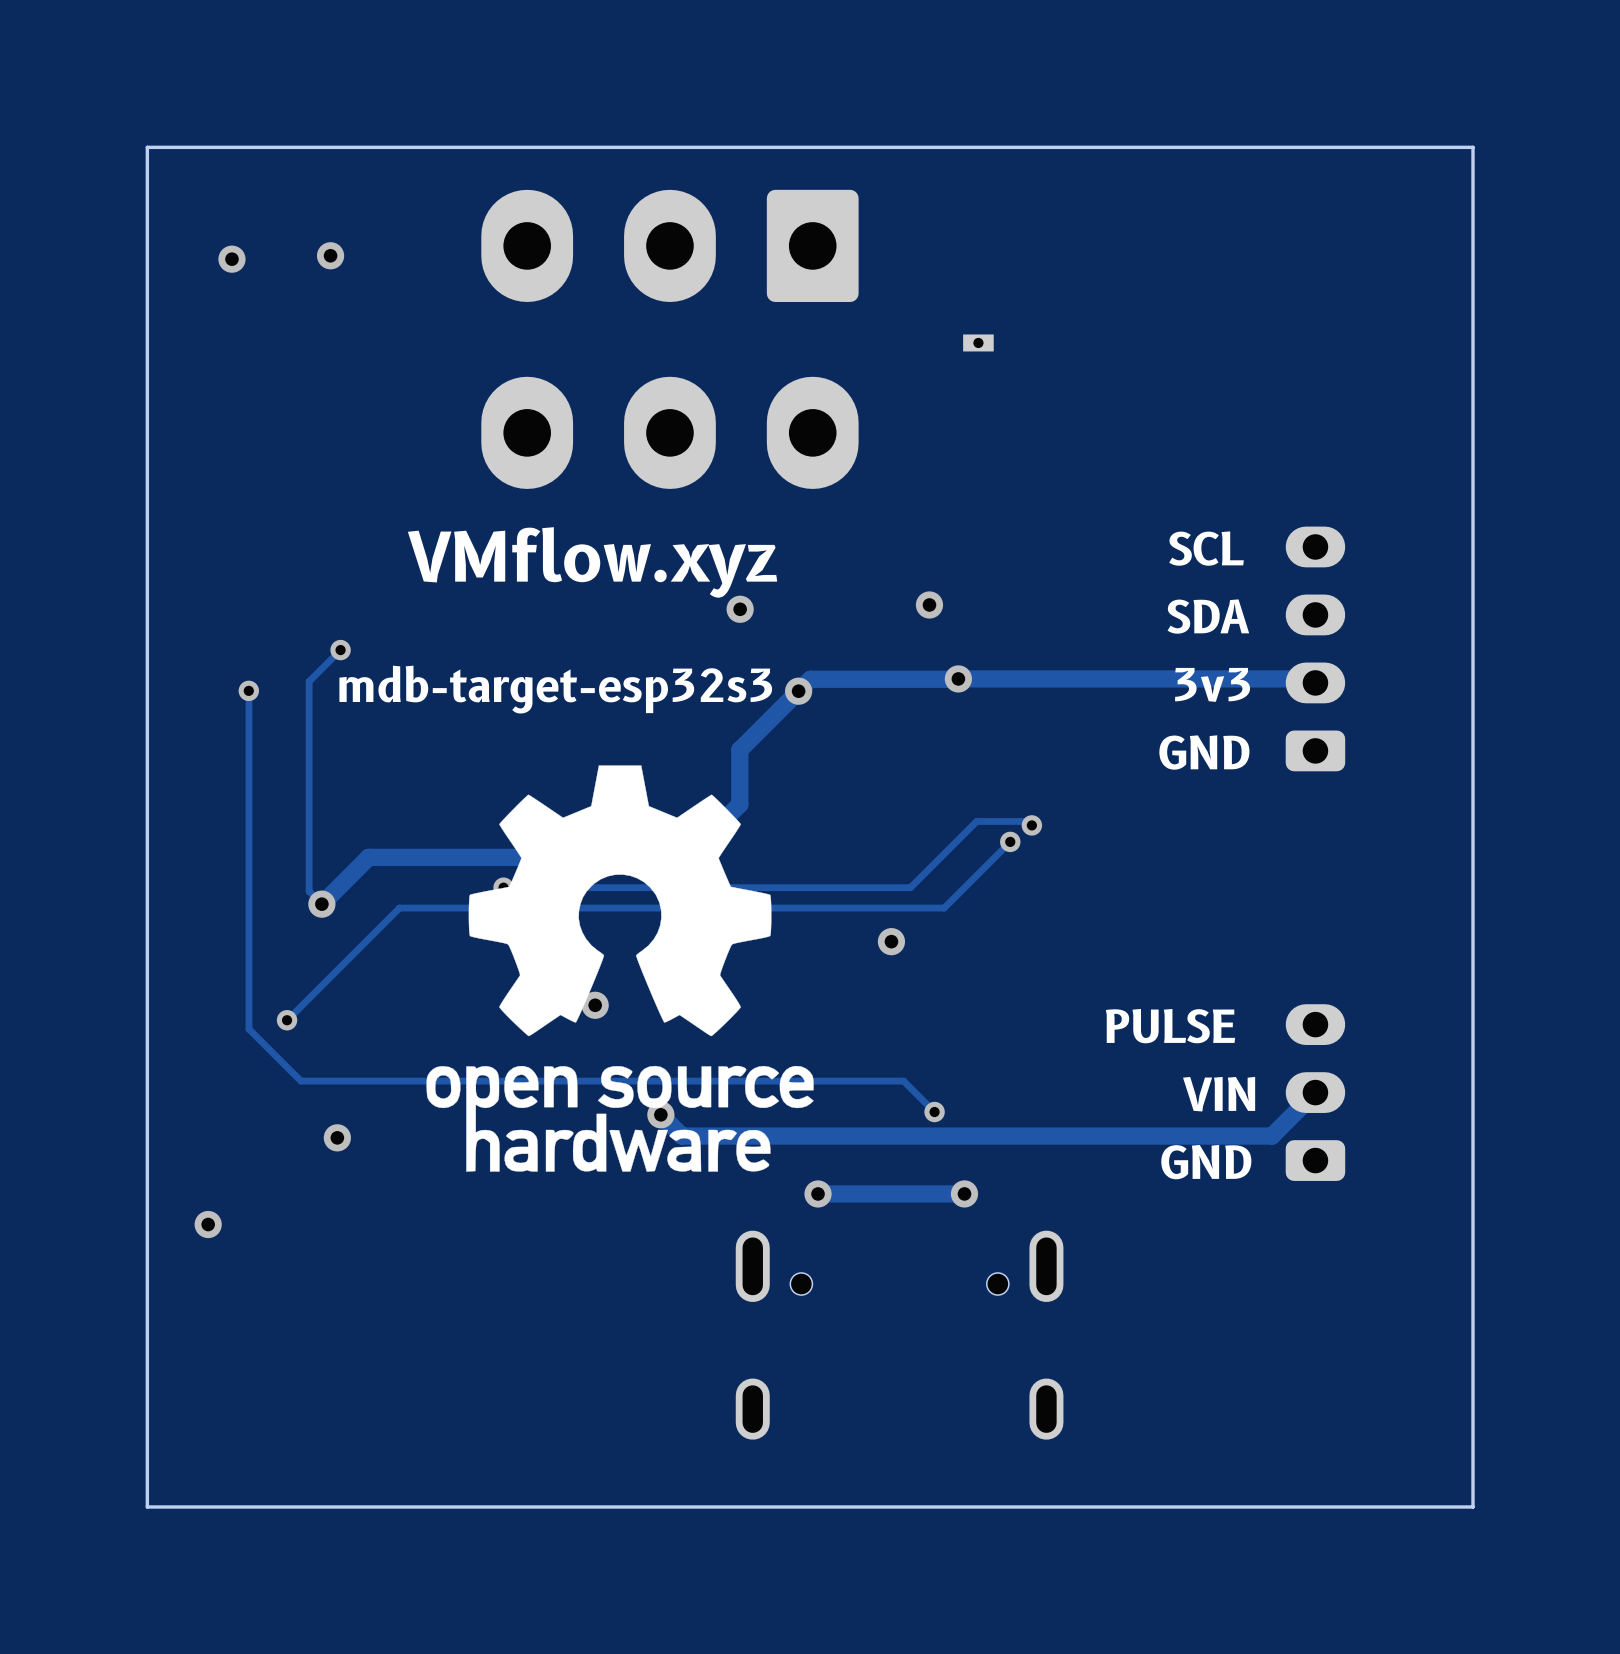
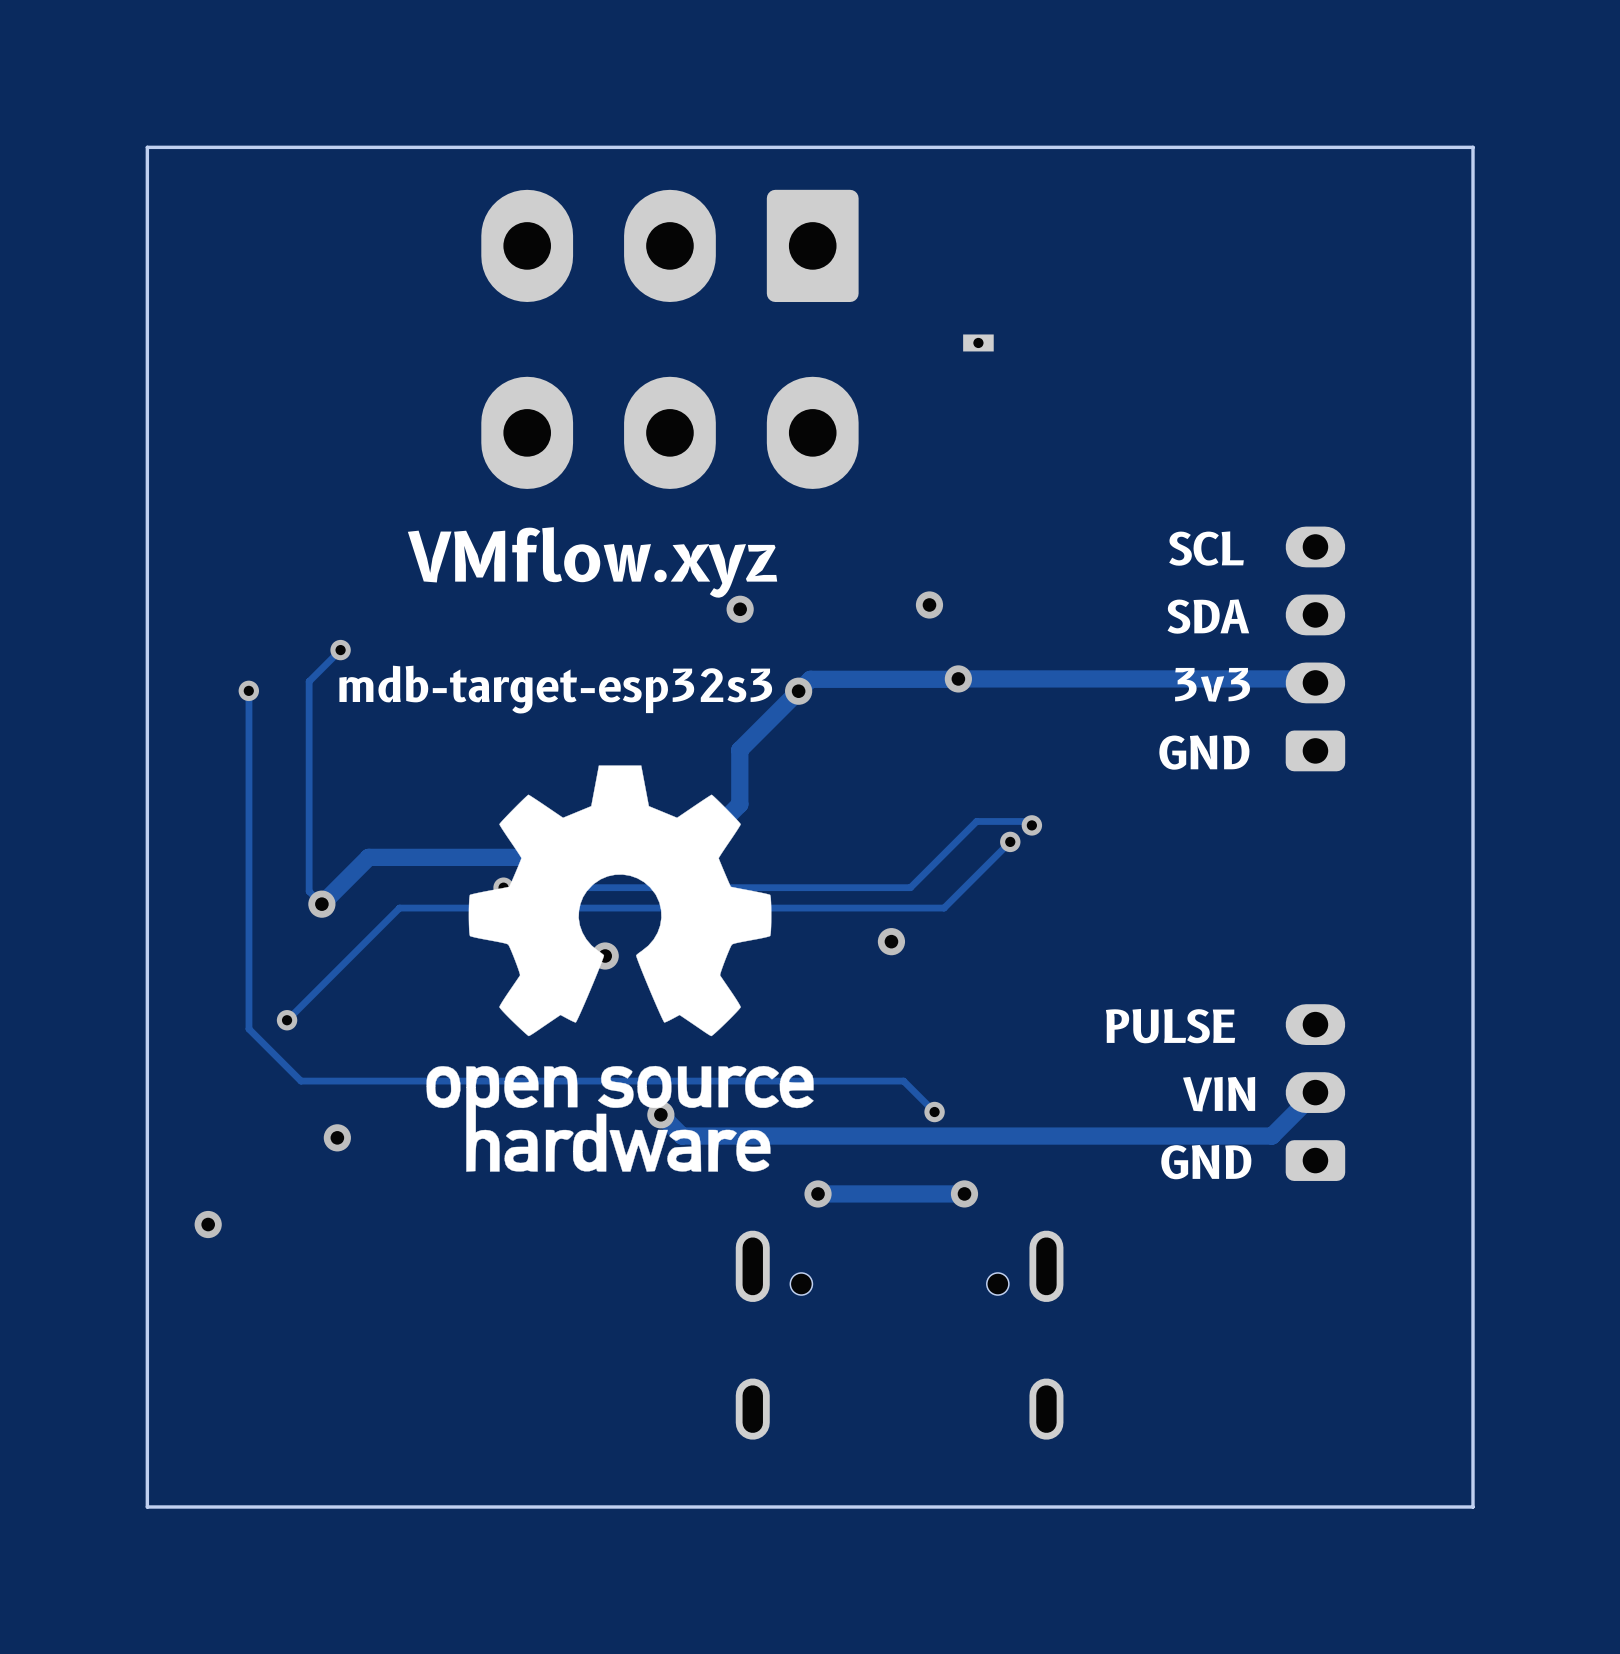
via: (330, 255) -> none
via: (231, 259) -> none
via position: (595, 1005) -> (605, 955)

